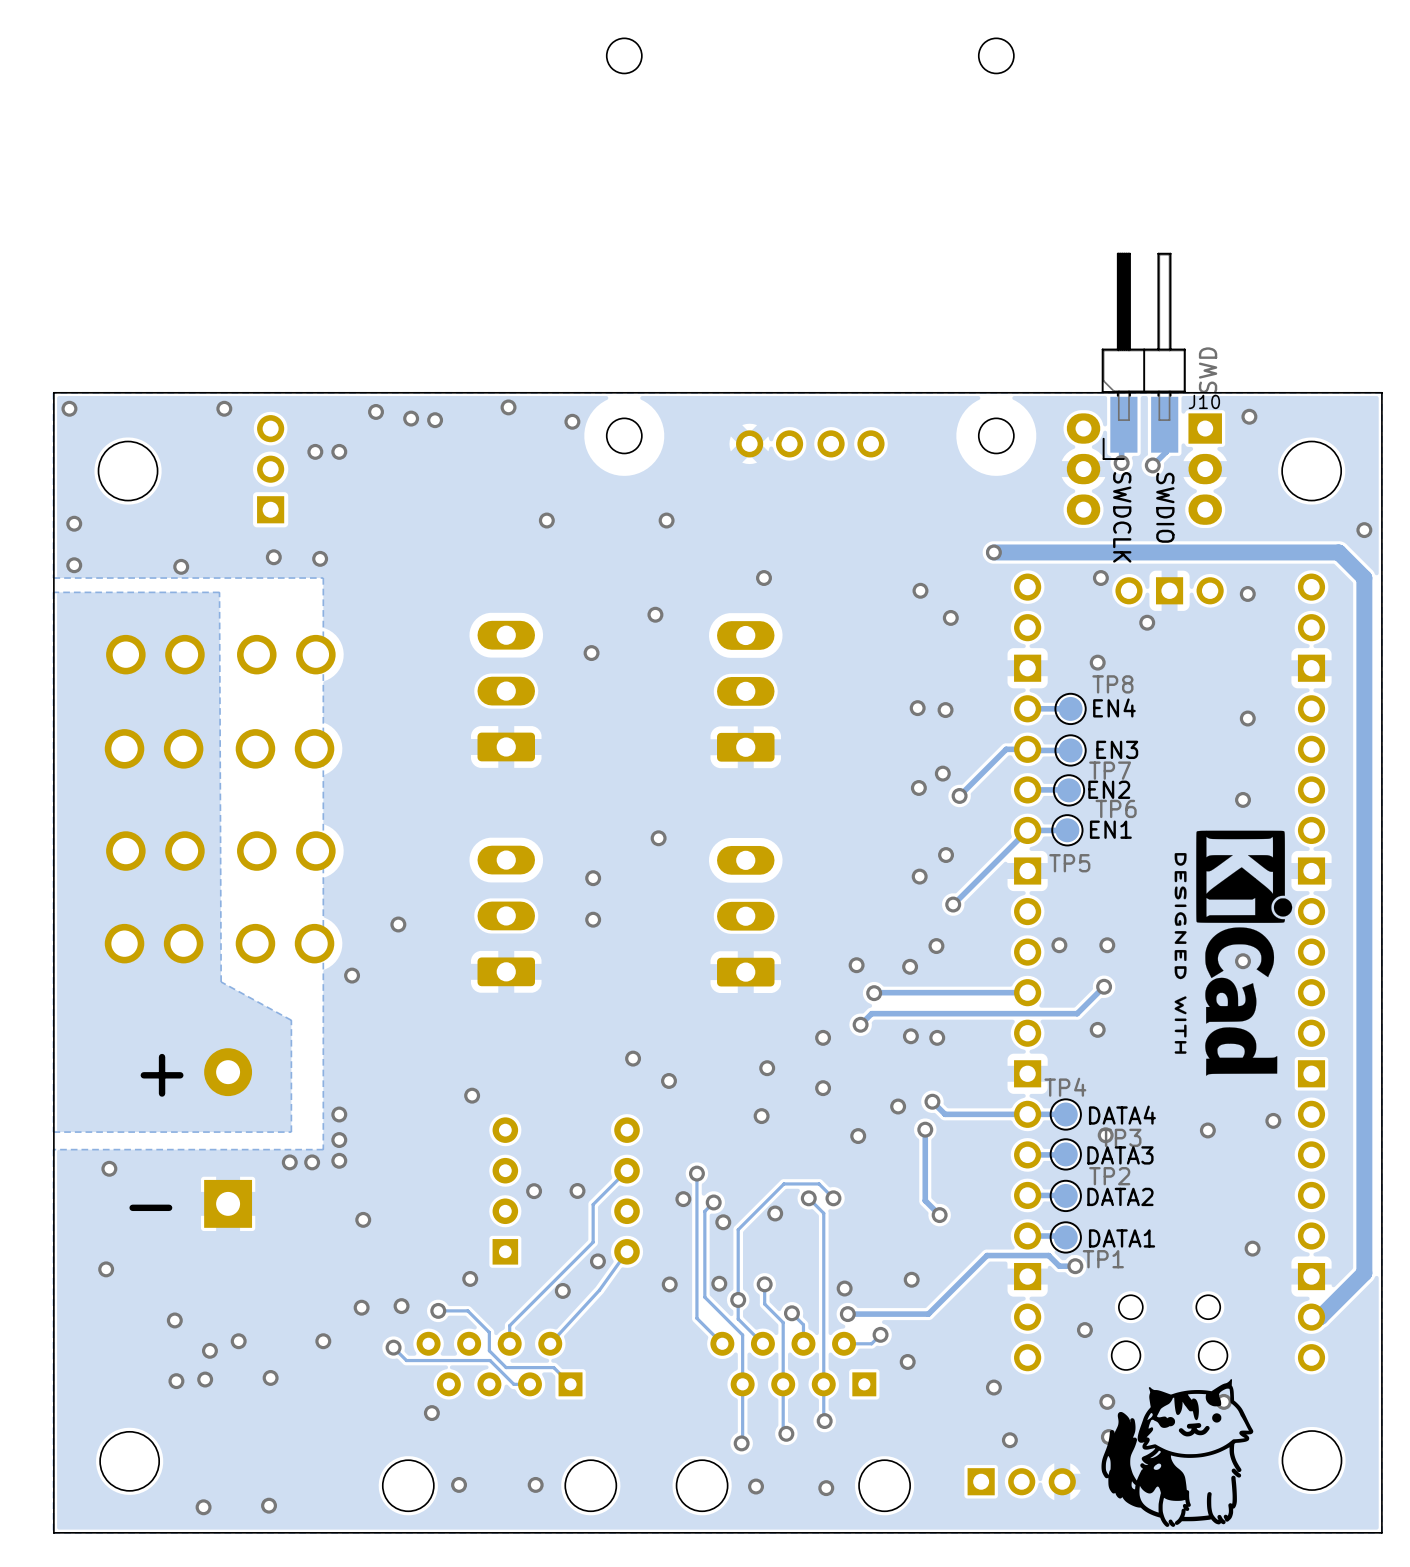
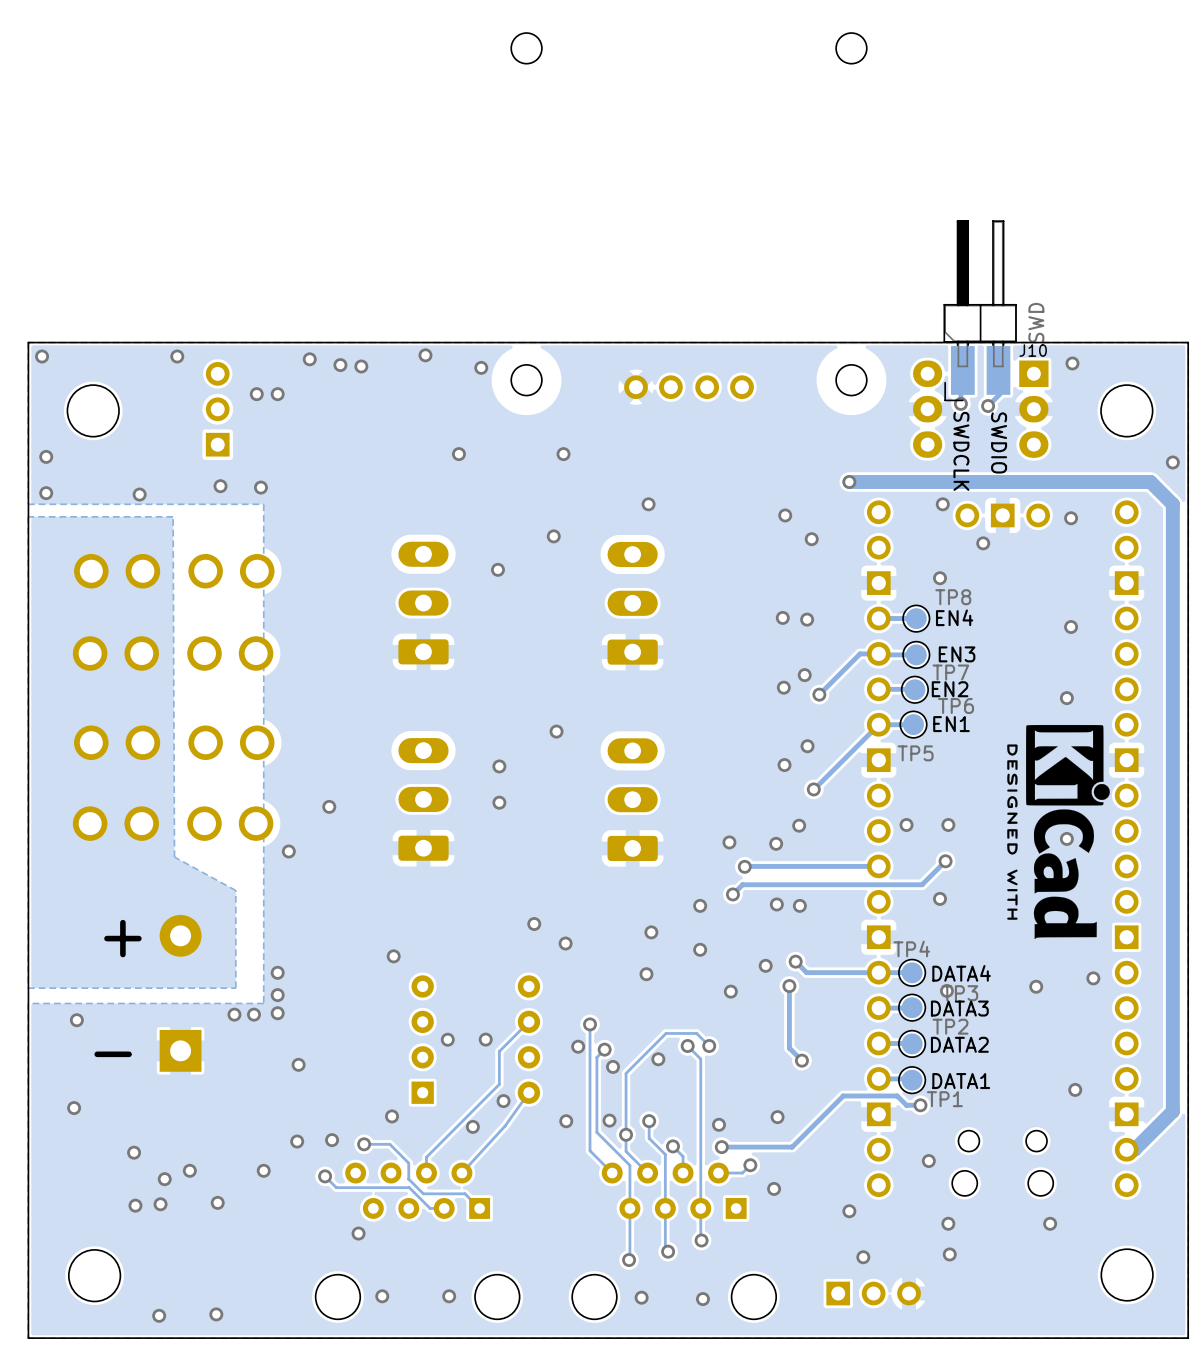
drawing: [1101, 1379, 1254, 1527] -> none

